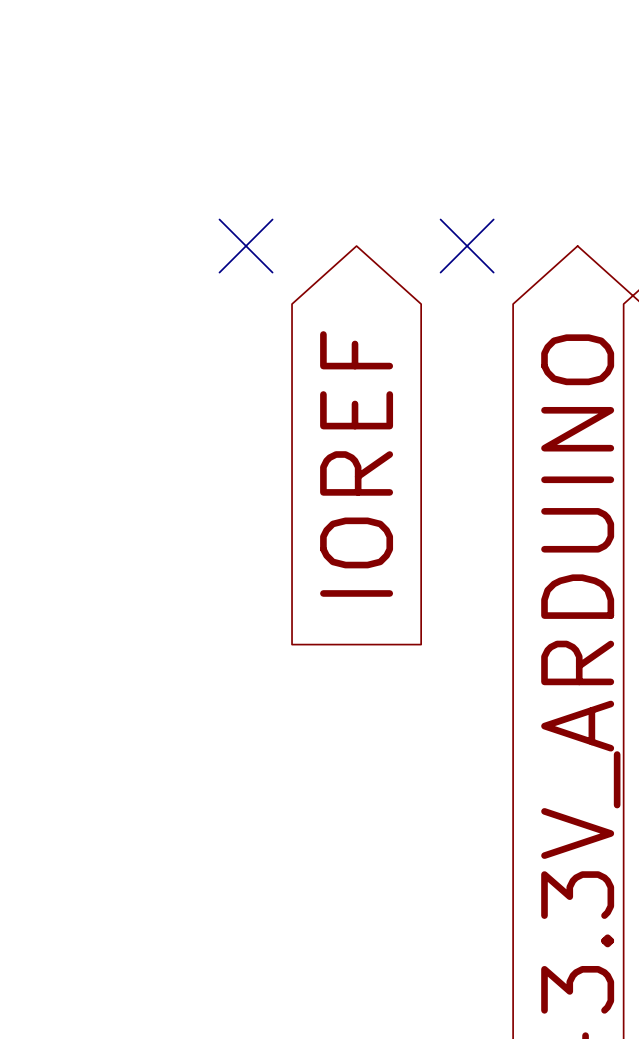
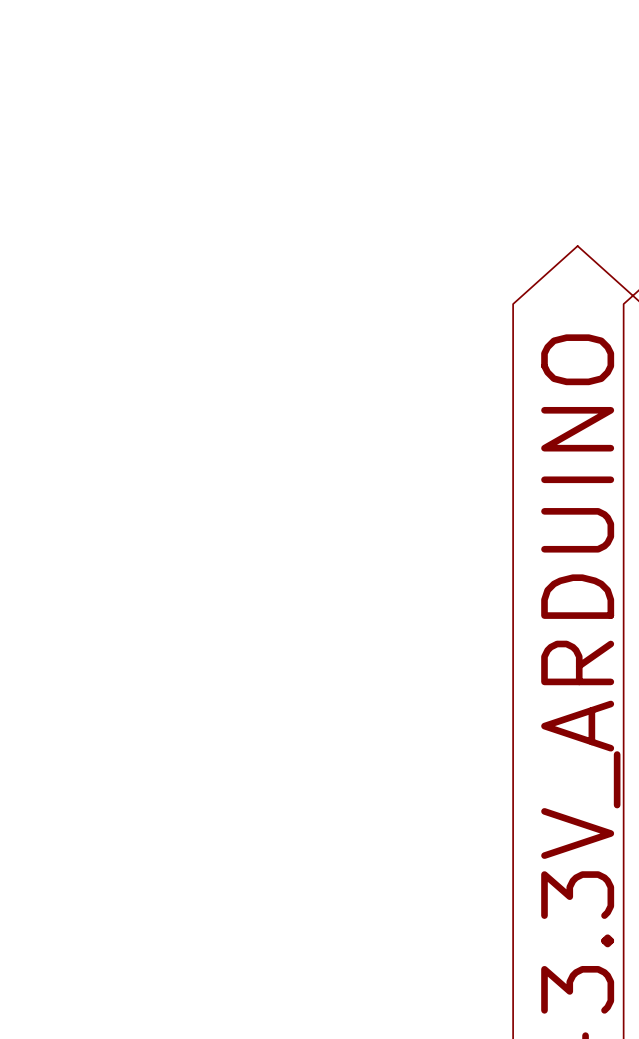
no-connect mark: (246, 246) -> none
no-connect mark: (467, 246) -> none
global label: IOREF (356, 463) -> none

